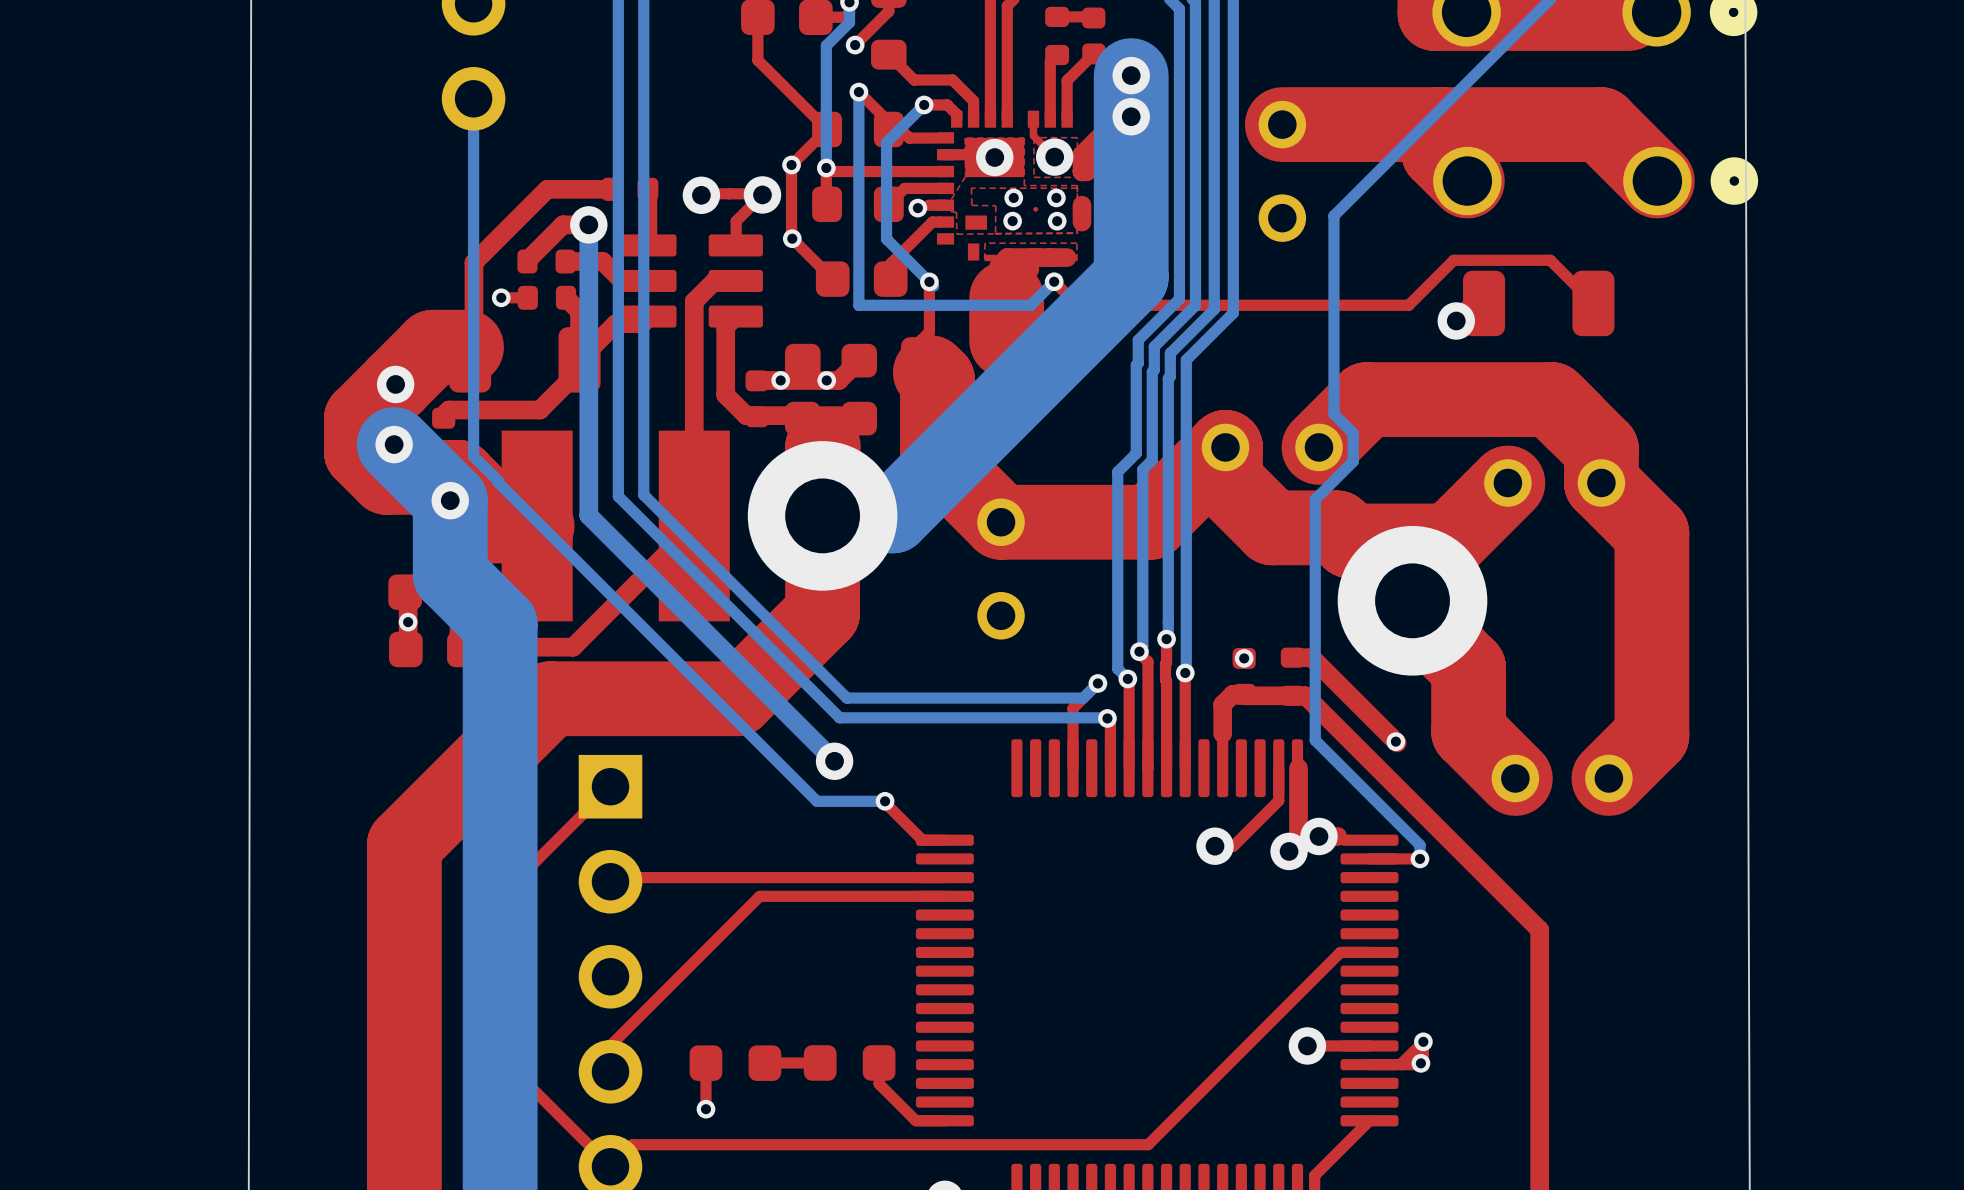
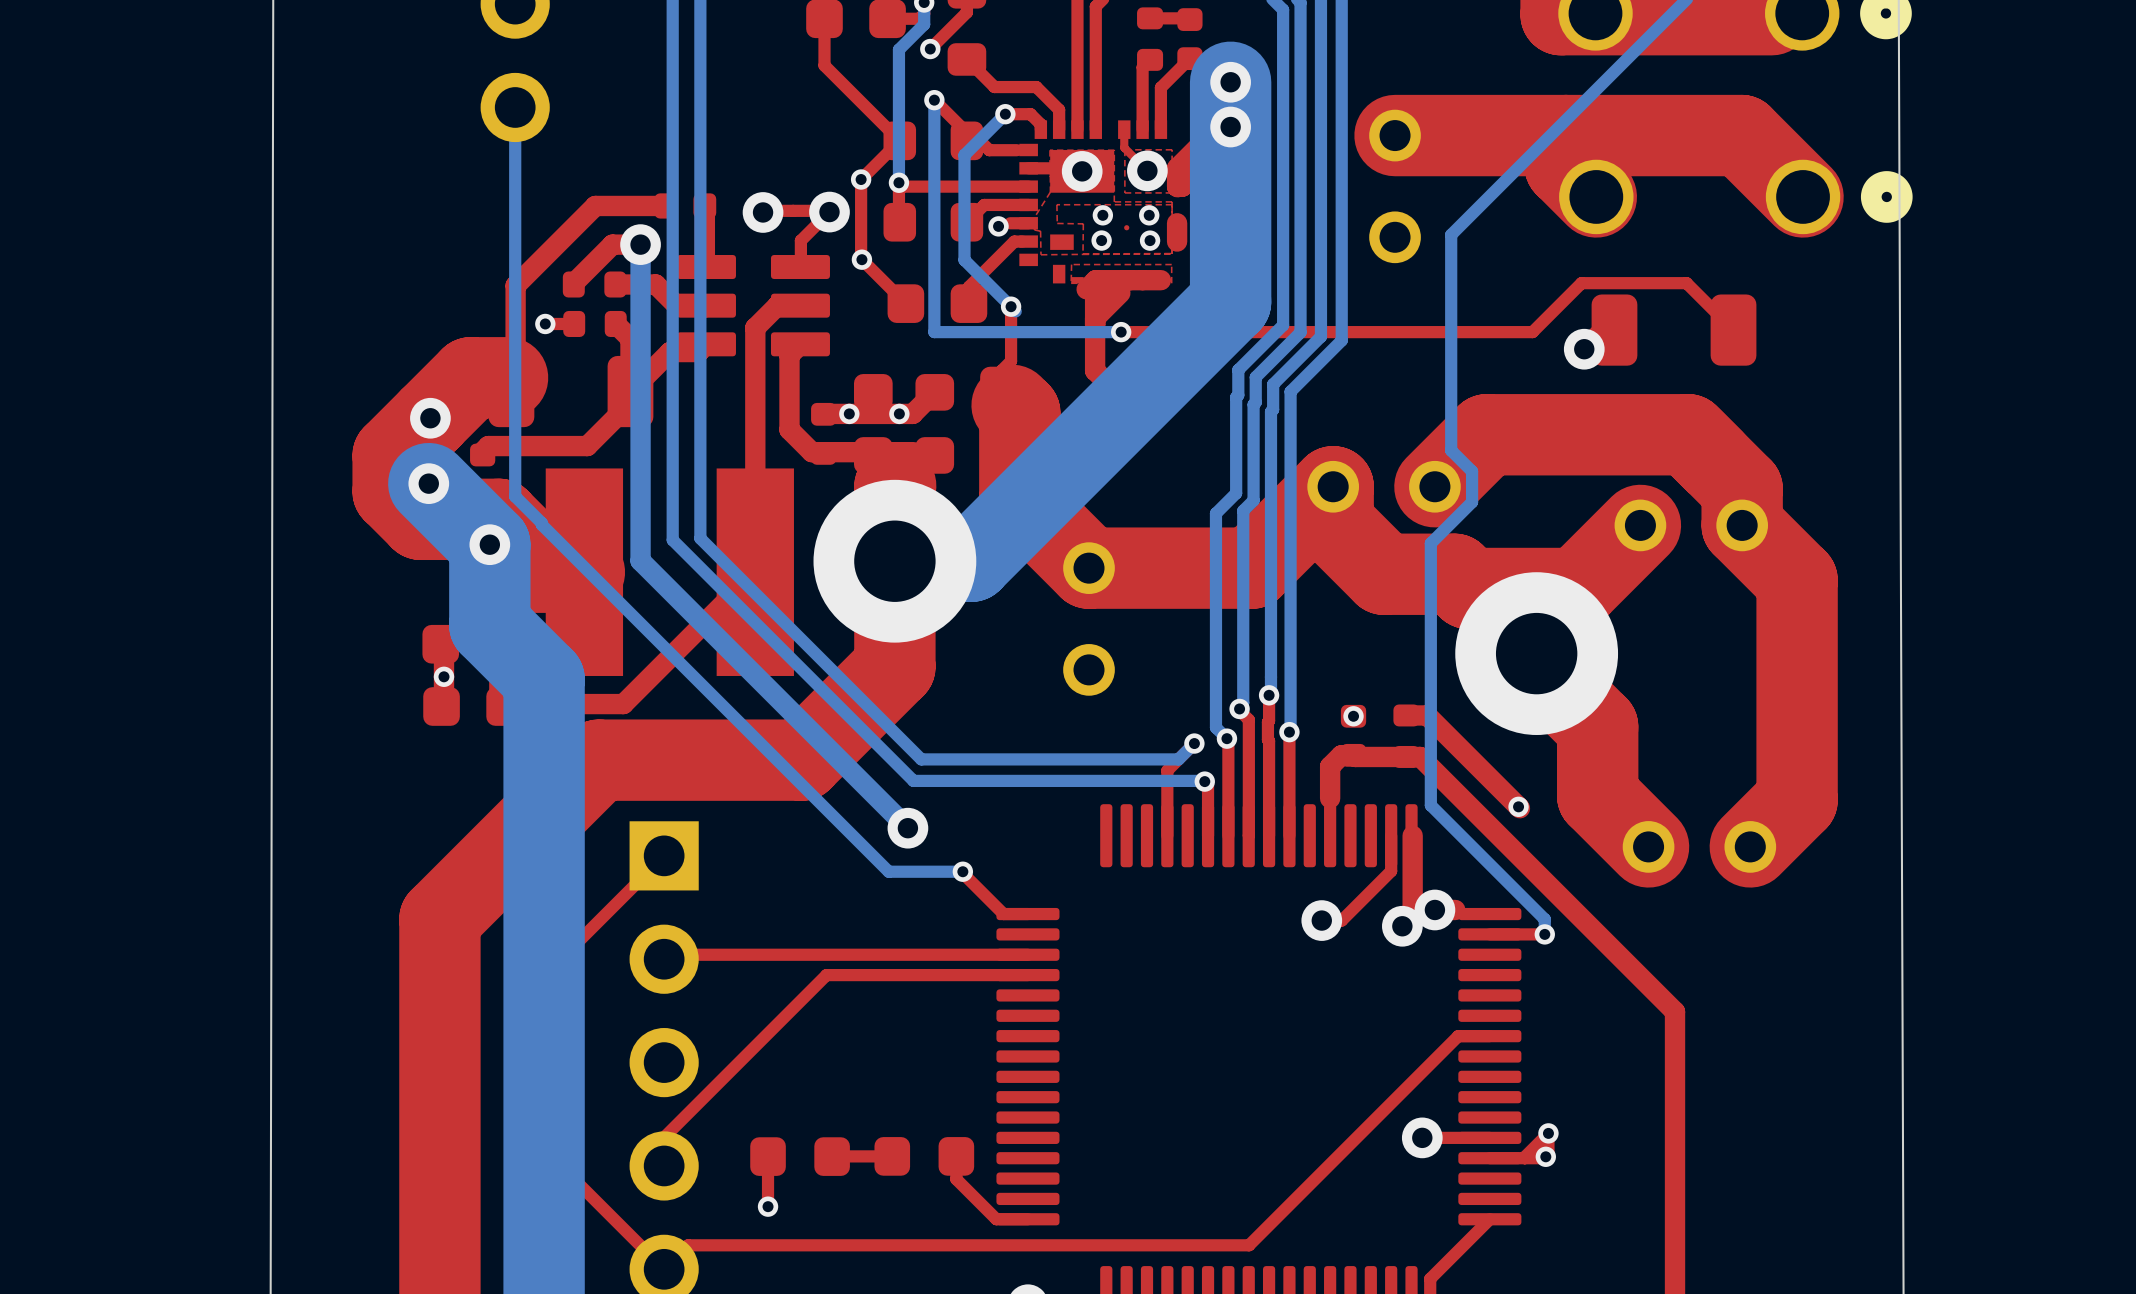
top track: (1054, 281) (1077, 305) -> (1121, 332) (1172, 332)
bottom track: (1054, 281) (1030, 305) -> none
via position: (1054, 281) -> (1121, 332)
top track width: thick (1006, 298) (1006, 340) -> thin (1095, 324) (1095, 370)

